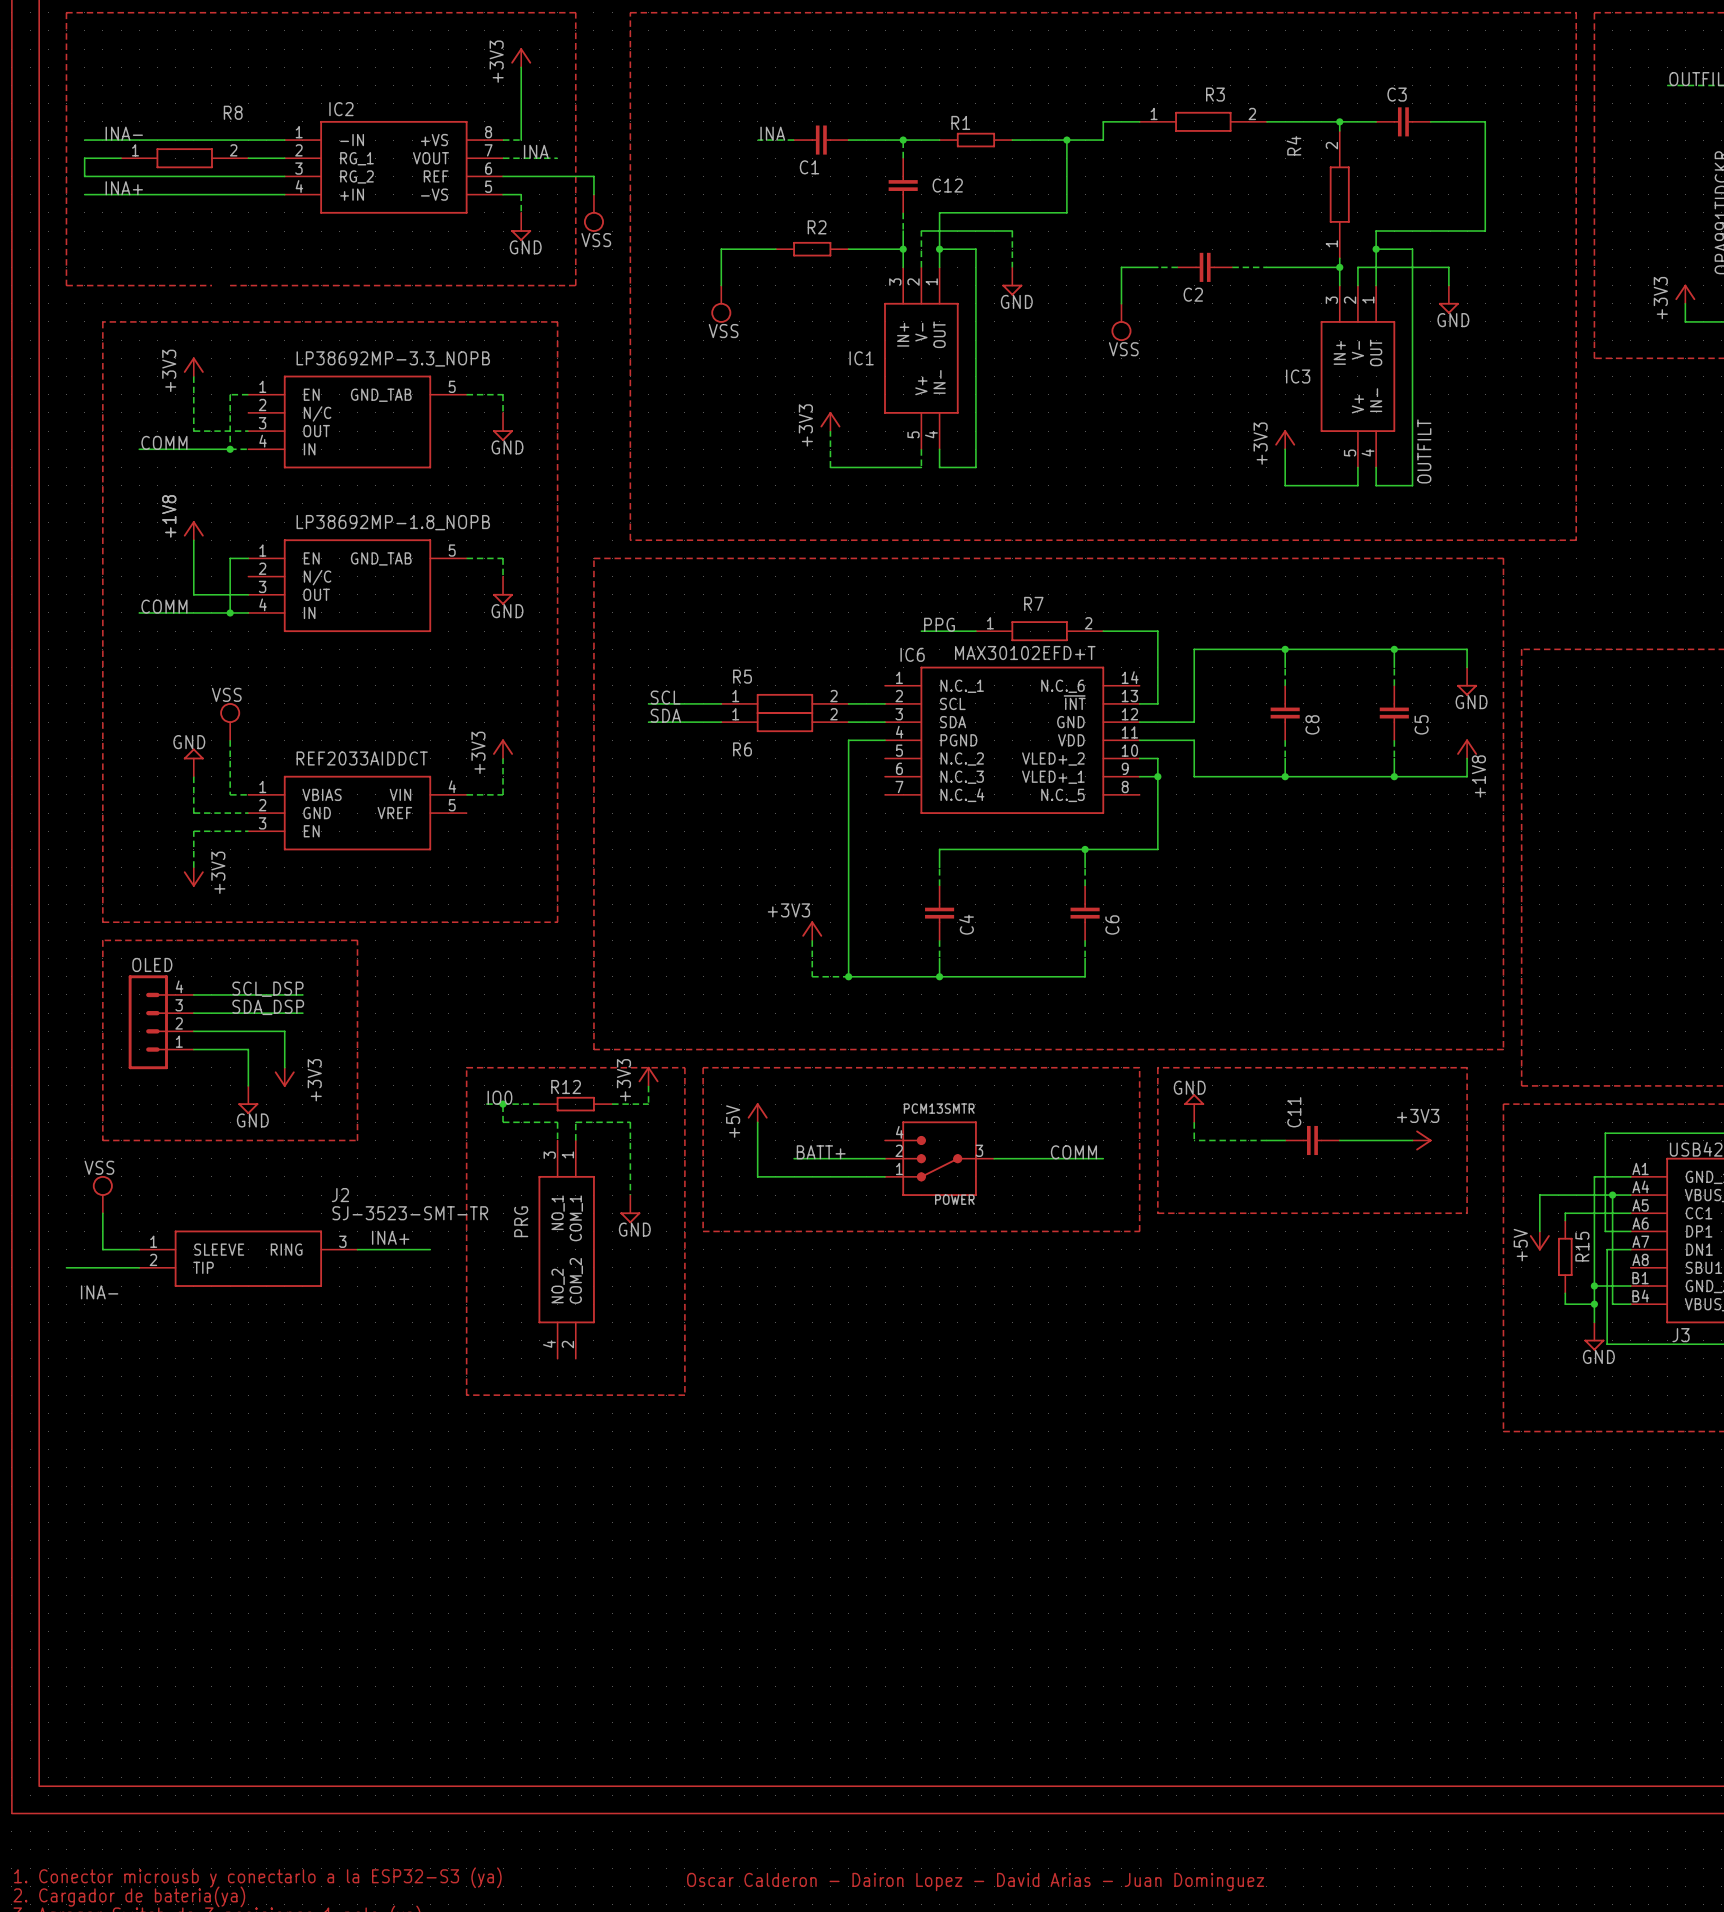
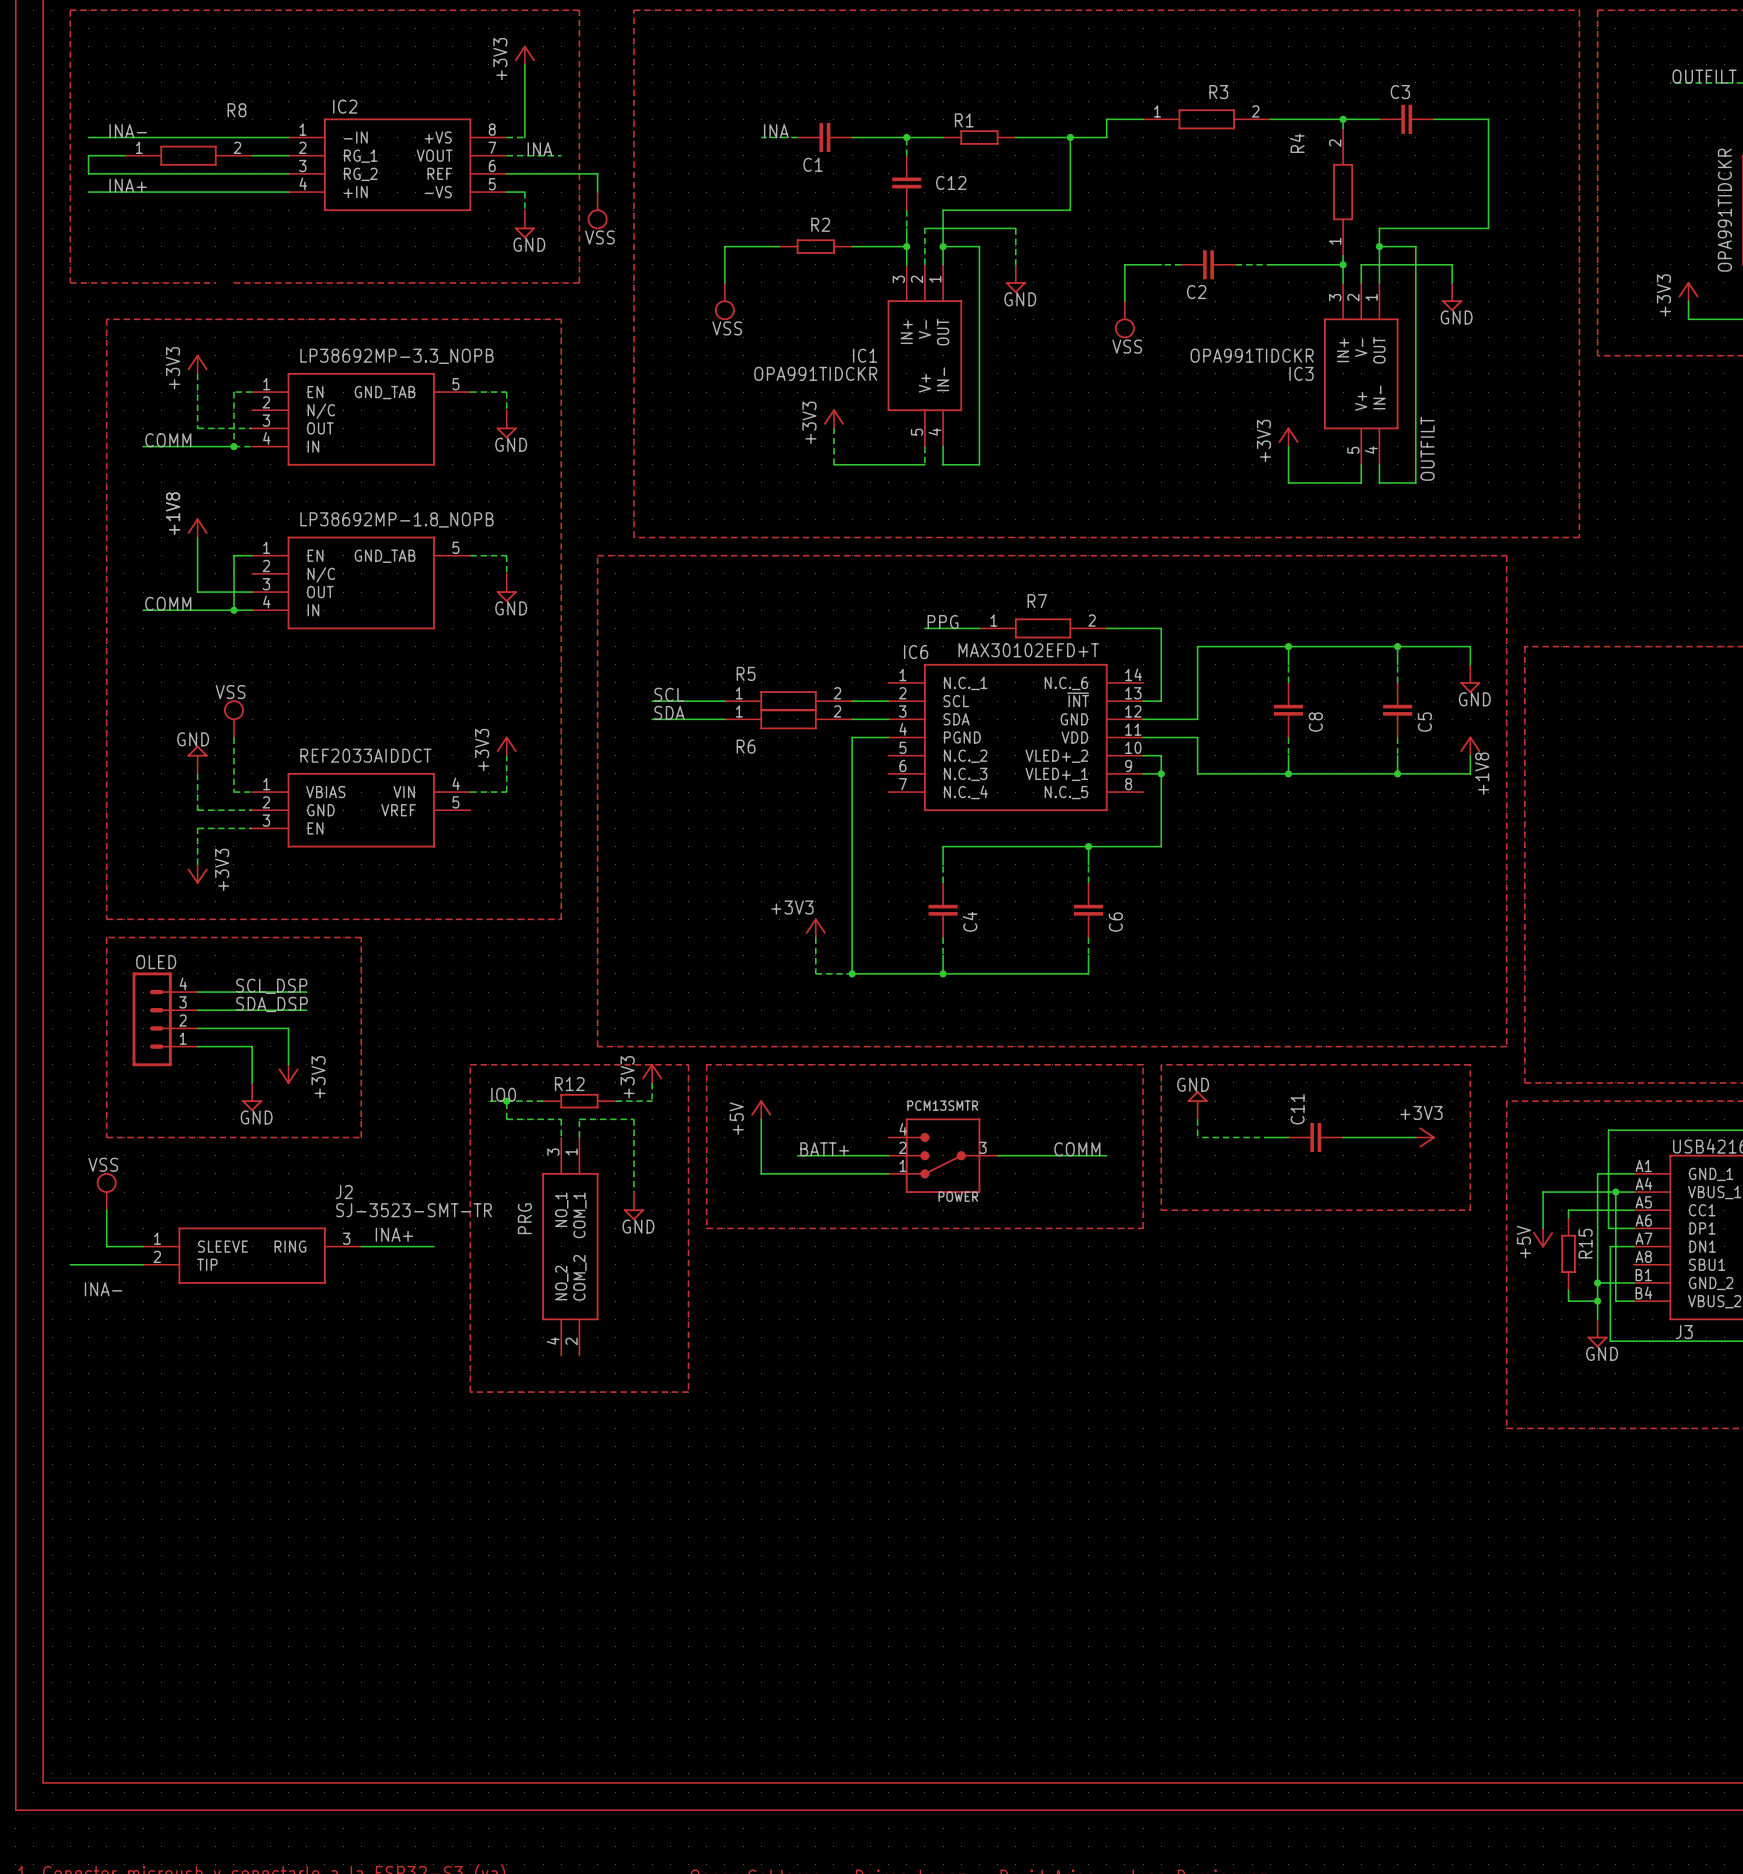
IC3 value: none -> OPA991TIDCKR (1252, 355)
IC1 value: none -> OPA991TIDCKR (815, 373)

